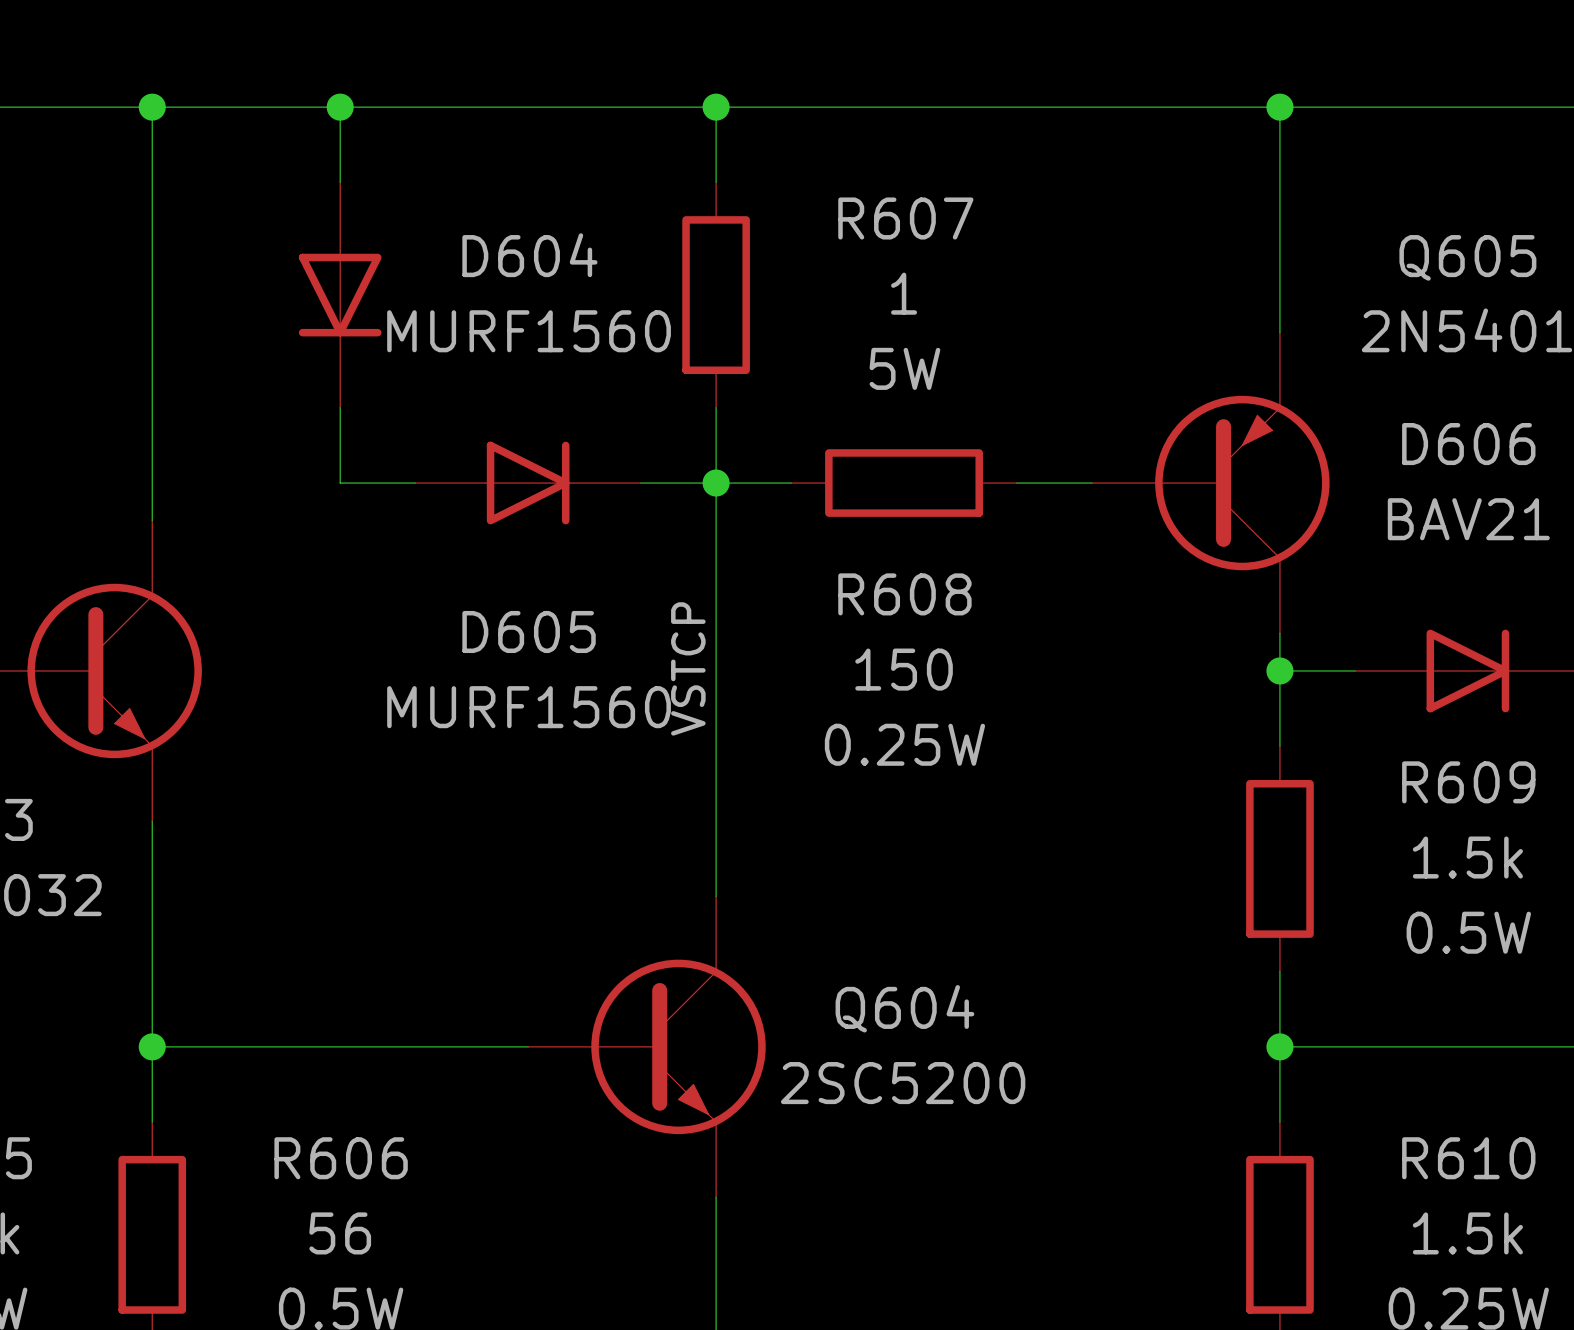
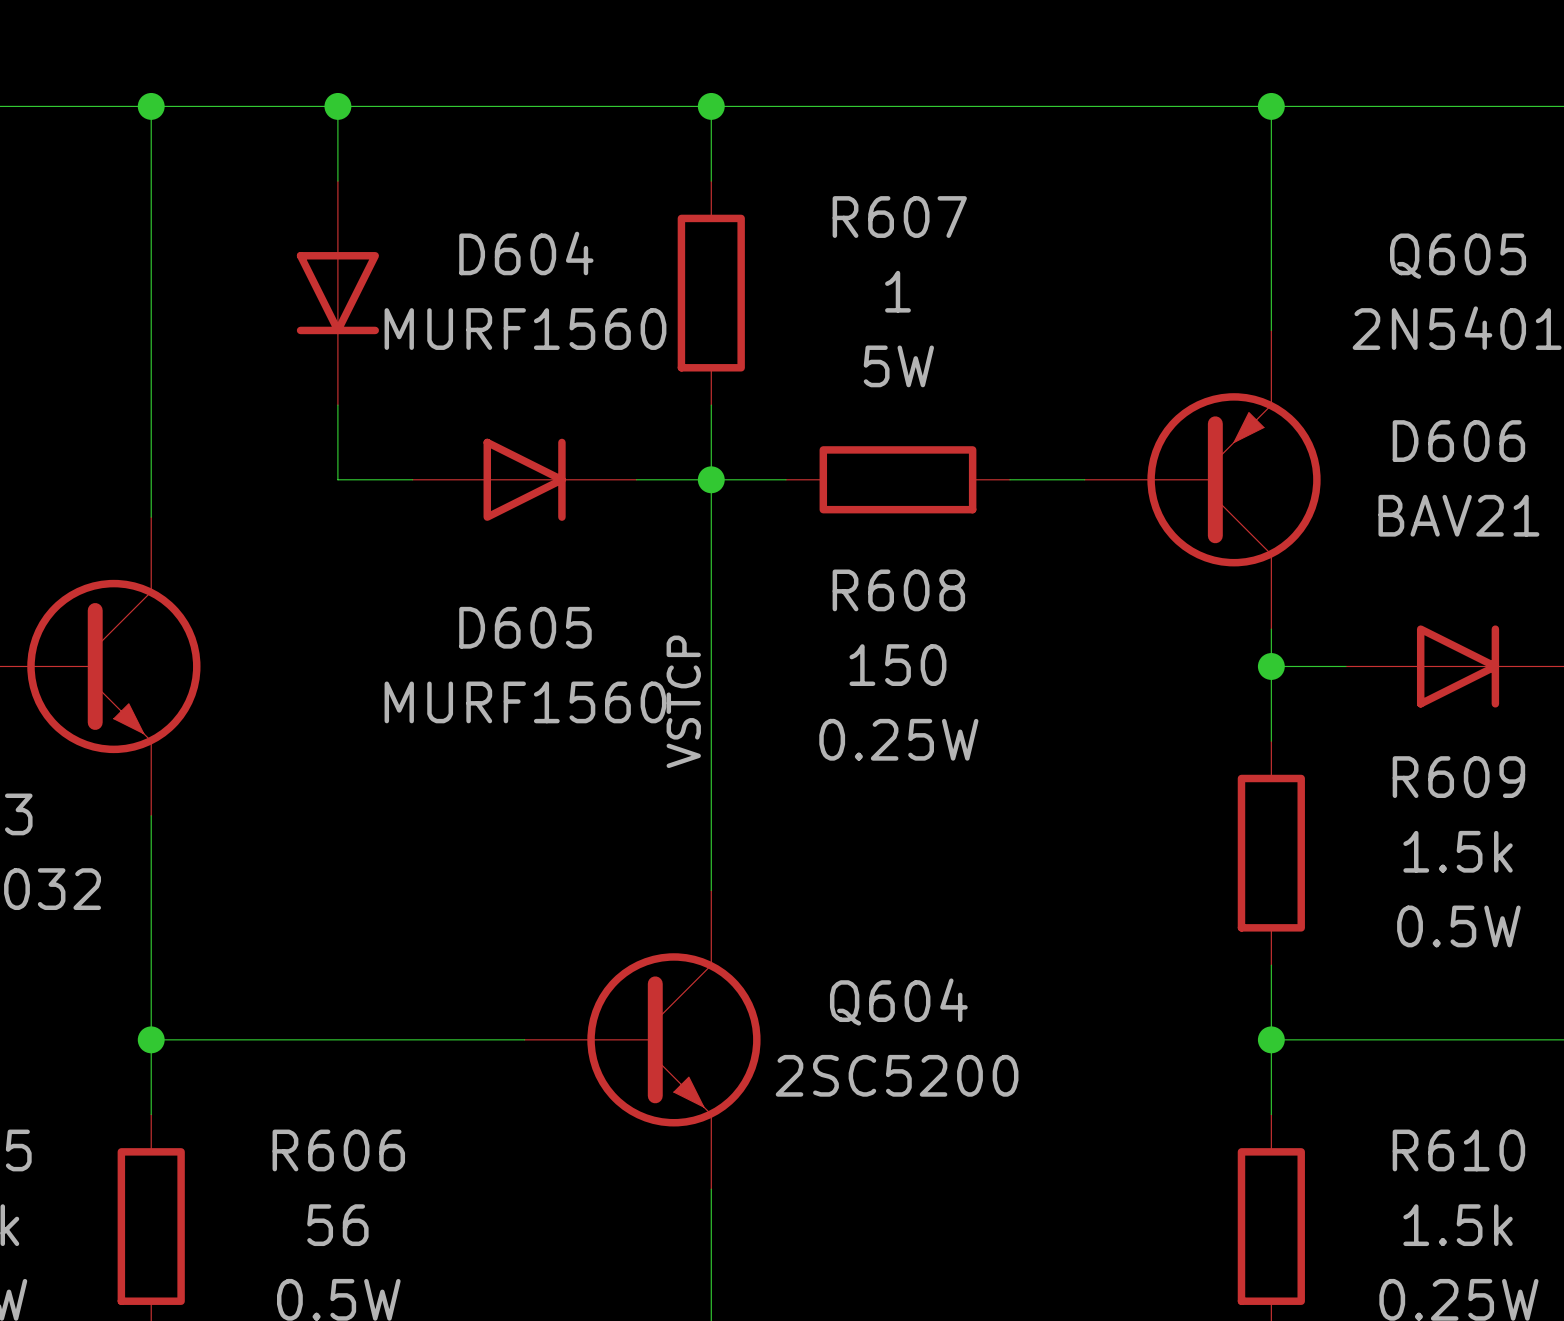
label position: VSTCP (688, 668) -> VSTCP (683, 701)

